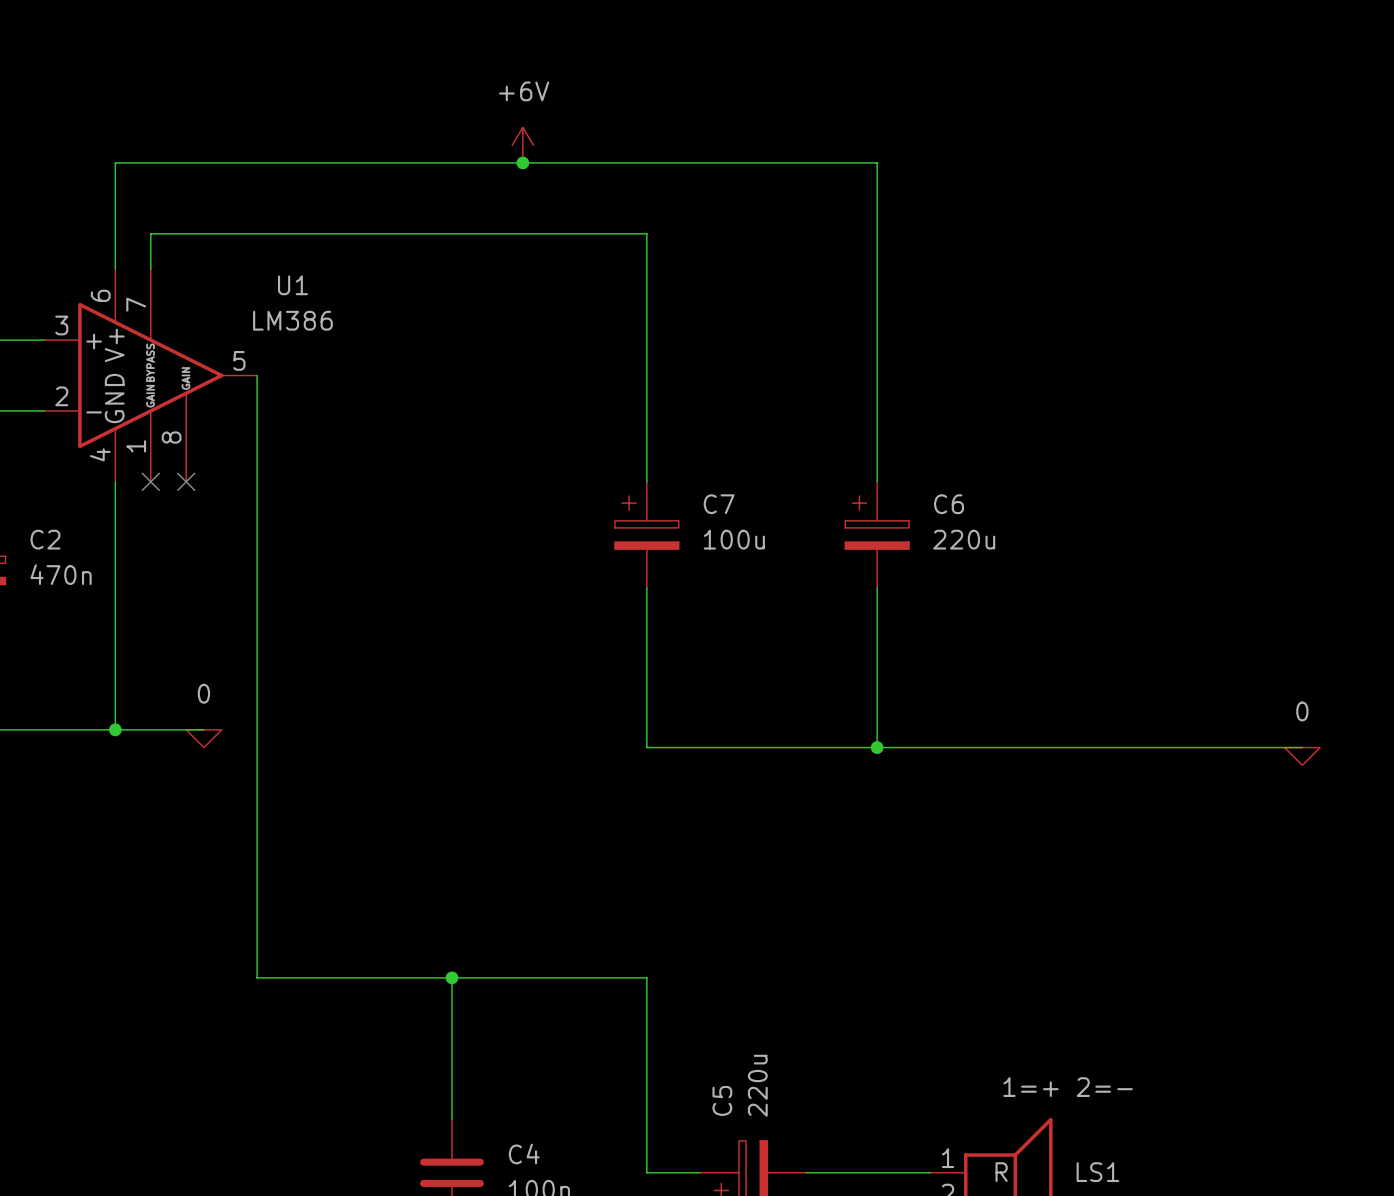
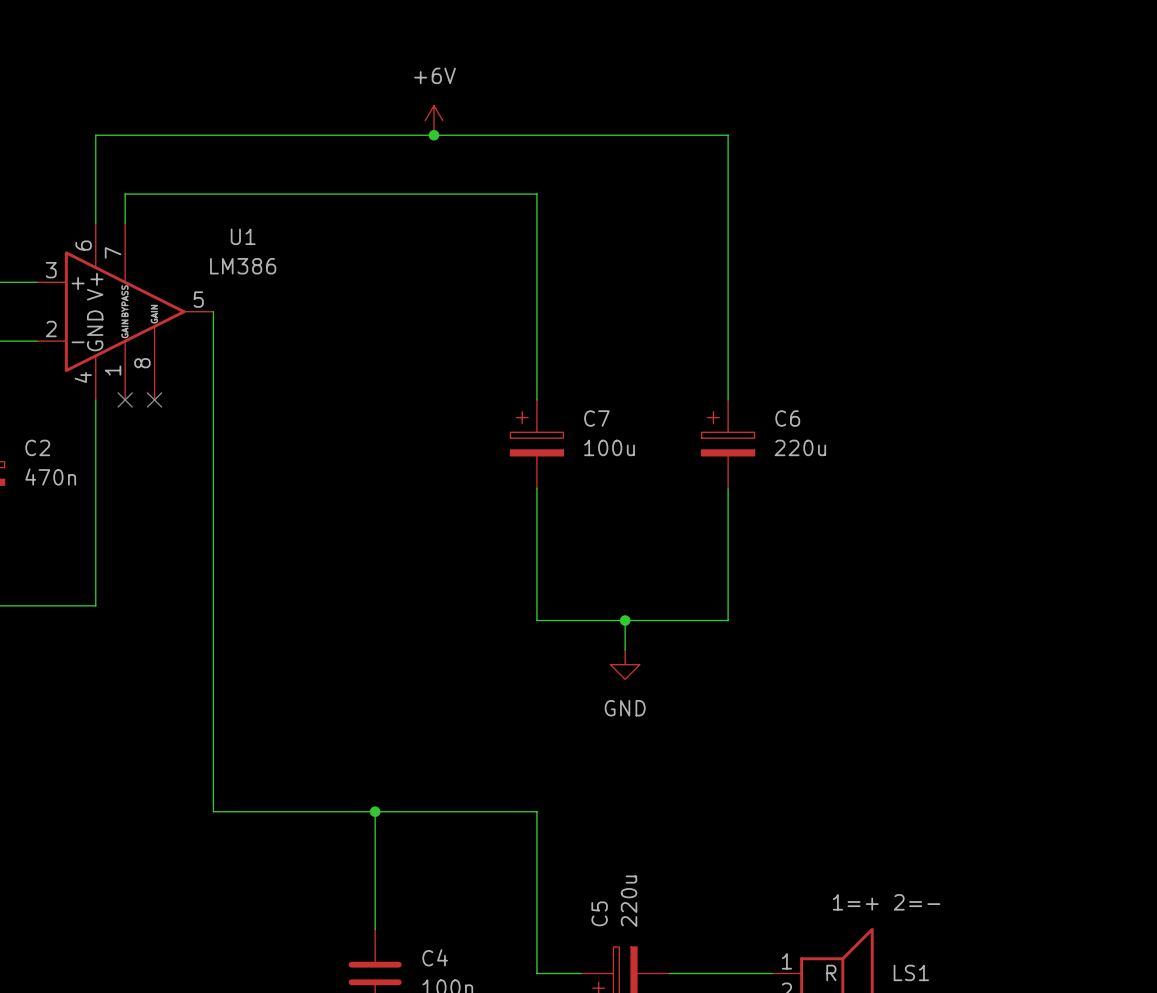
wire: (115, 729) (203, 729) -> none
junction: (115, 729) -> none
power symbol: 0 (203, 738) -> none
wire: none -> (625, 620) (625, 649)
junction: none -> (625, 620)
wire: (877, 747) (1302, 747) -> none
junction: (877, 747) -> none
power symbol: 0 (1302, 756) -> none
power symbol: none -> GND (625, 664)

